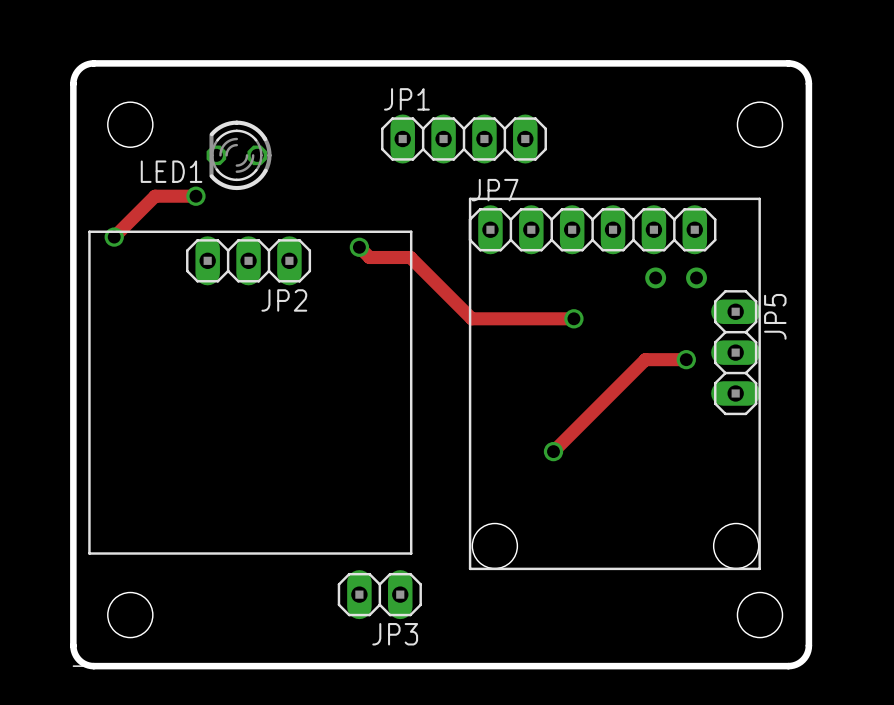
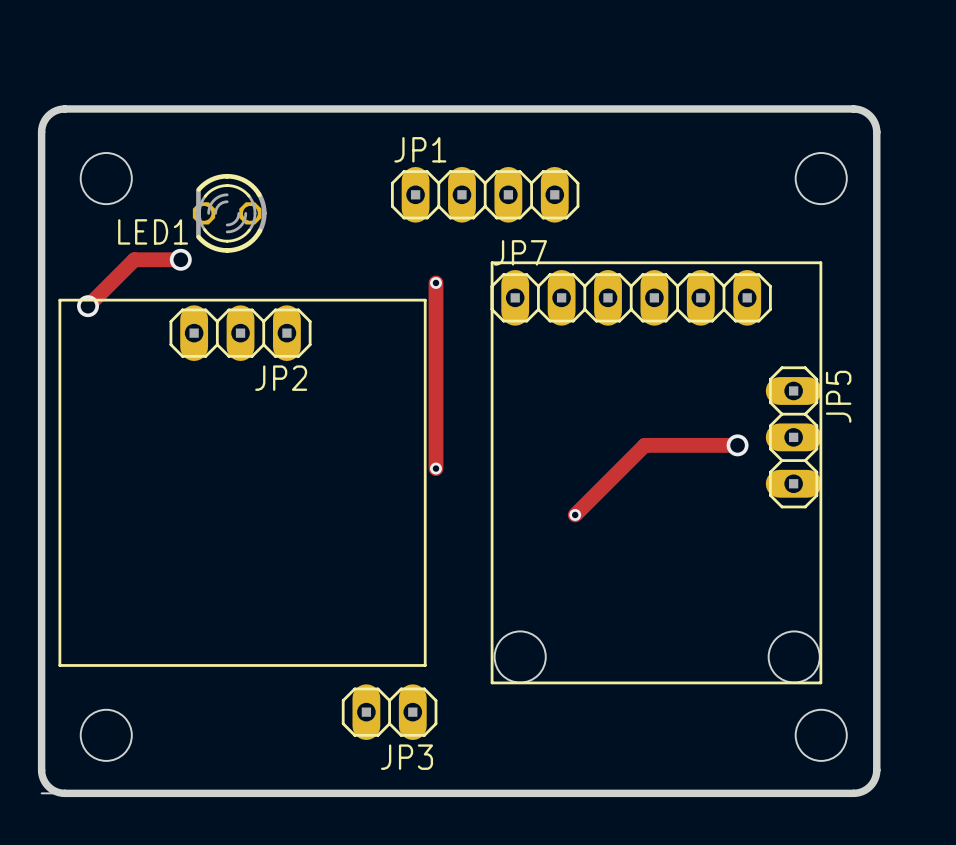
track: none -> (435, 282) (435, 468)
via: none -> (435, 282)
track: (359, 247) (369, 257) (410, 257) (471, 318) (573, 318) -> none
via: (359, 247) -> none
via: (655, 277) -> none
via: (696, 277) -> none
via: (573, 318) -> none
track: (645, 359) (553, 451) -> (691, 445) (644, 445) (575, 514)
via: none -> (435, 468)
via: none -> (575, 514)
via: (553, 451) -> none

